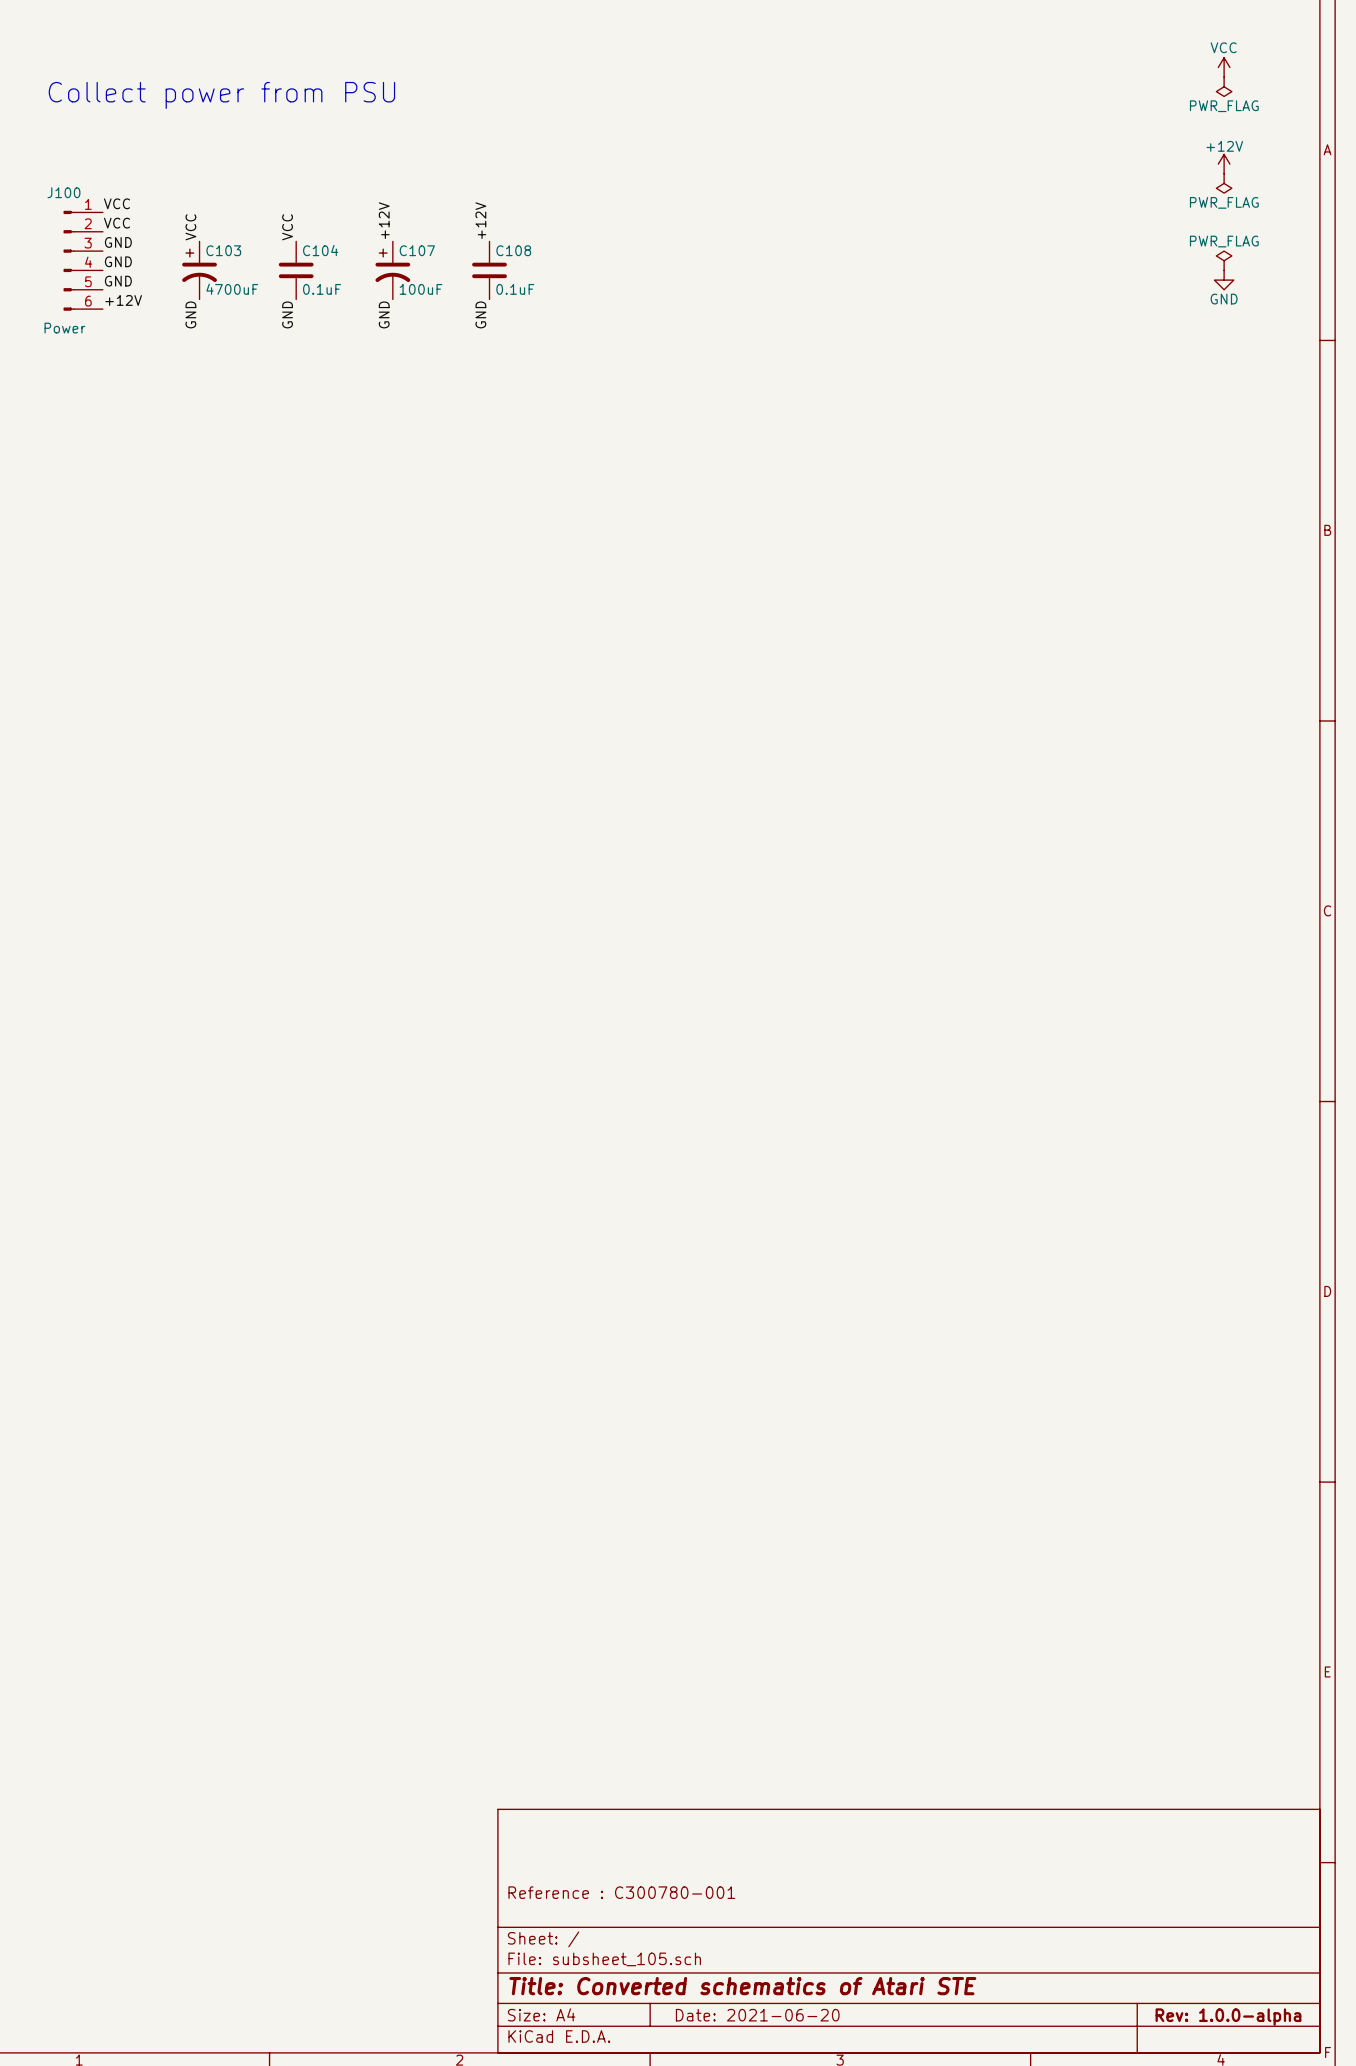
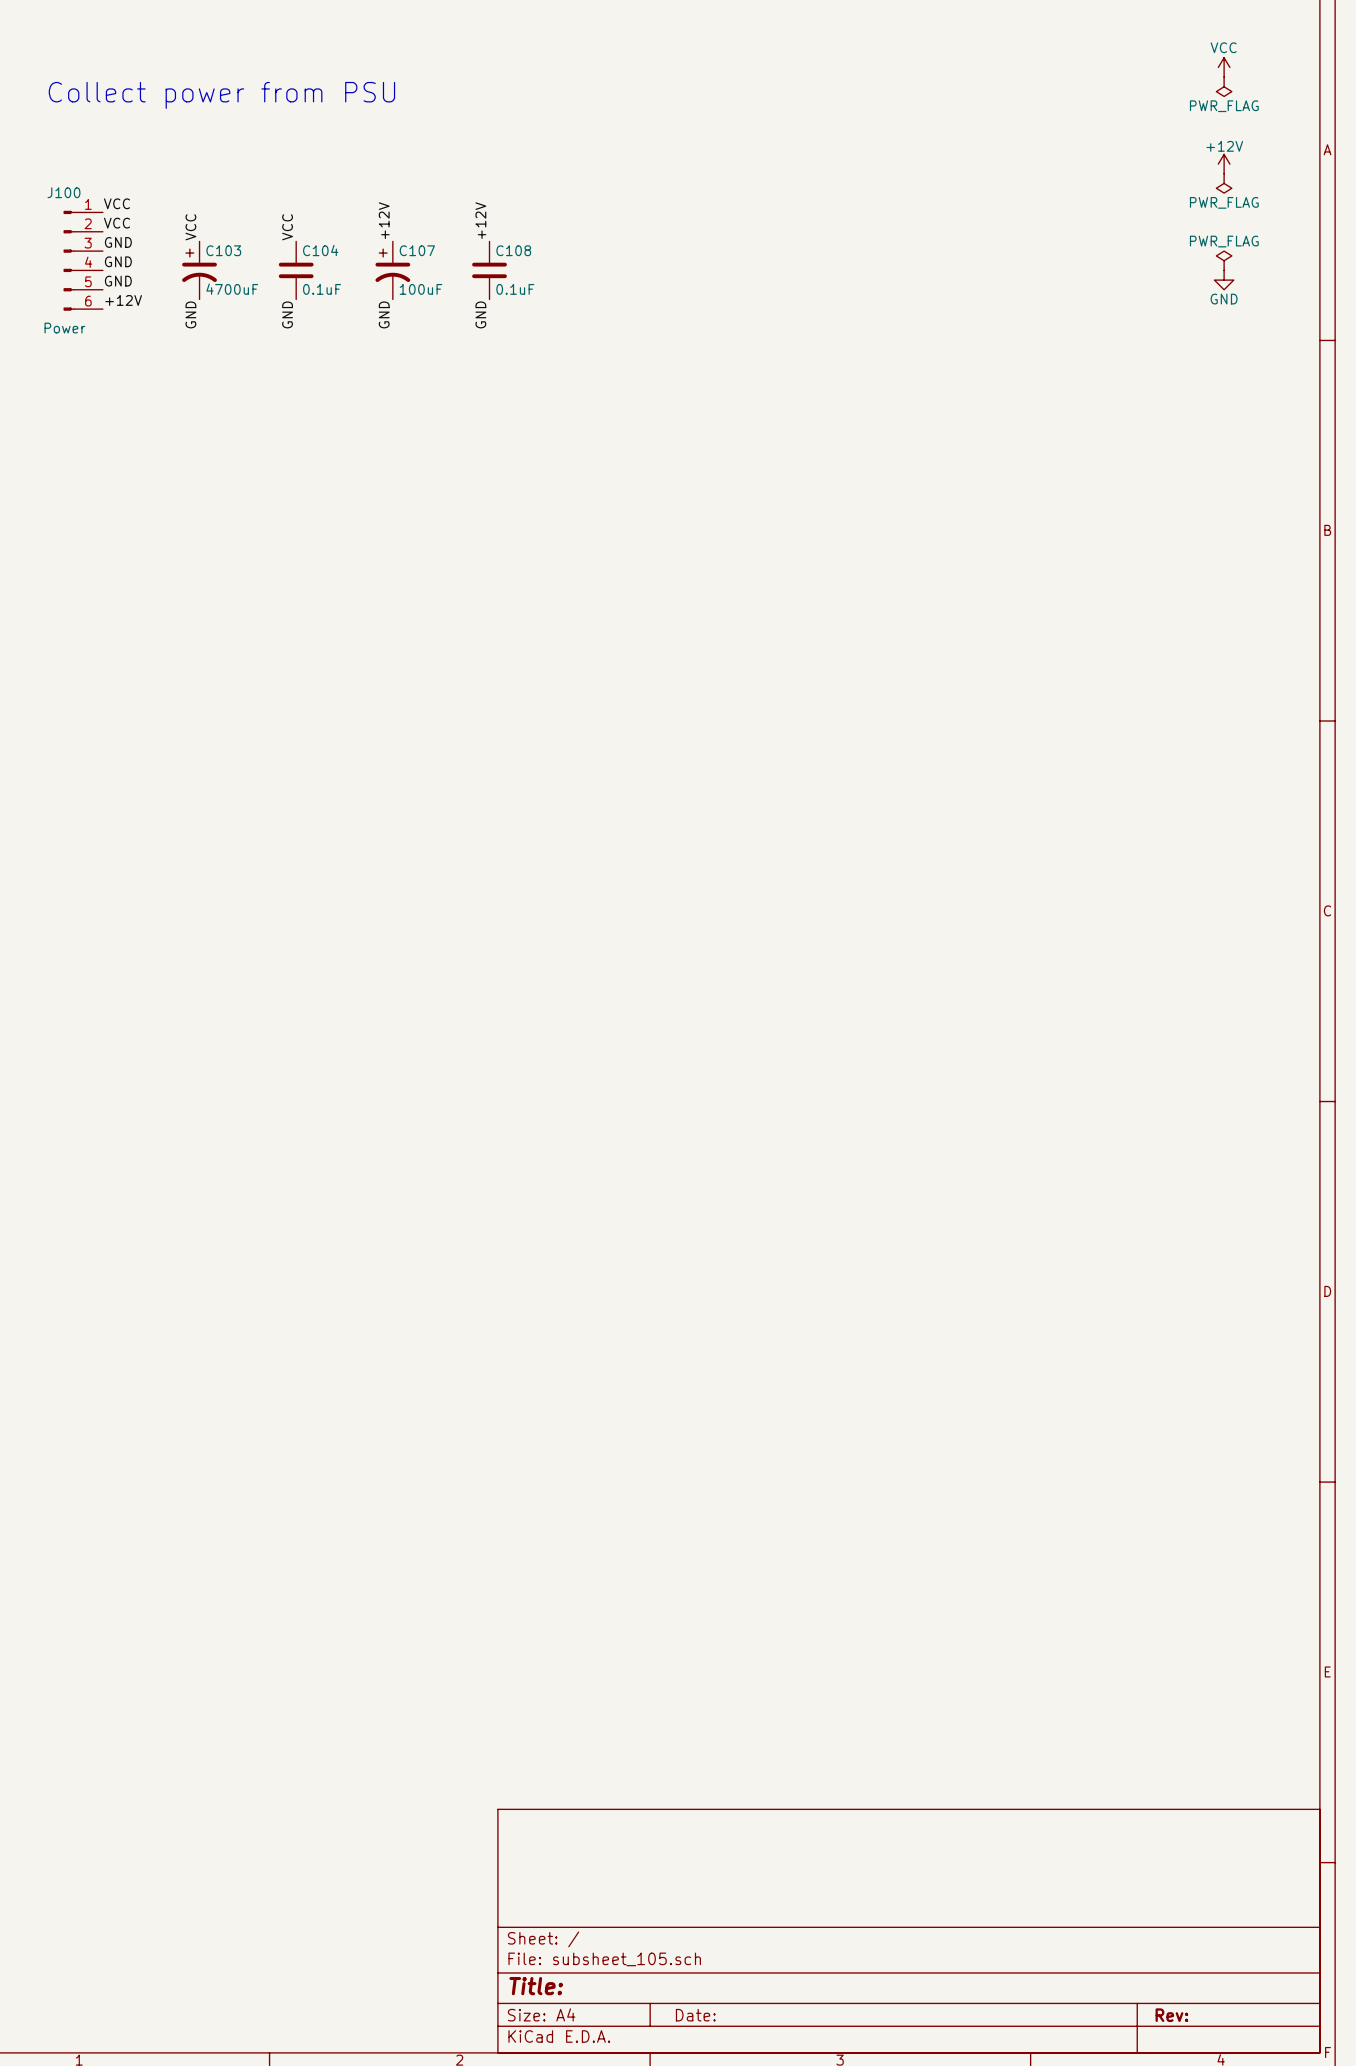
title block: Reference : C300780-001 (621, 1892) -> none
title block: Title: Converted schematics of Atari STE (742, 1986) -> Title: (536, 1986)
title block: Date: 2021-06-20 (757, 2015) -> Date: (695, 2015)
title block: Rev: 1.0.0-alpha (1228, 2017) -> Rev: (1171, 2015)

